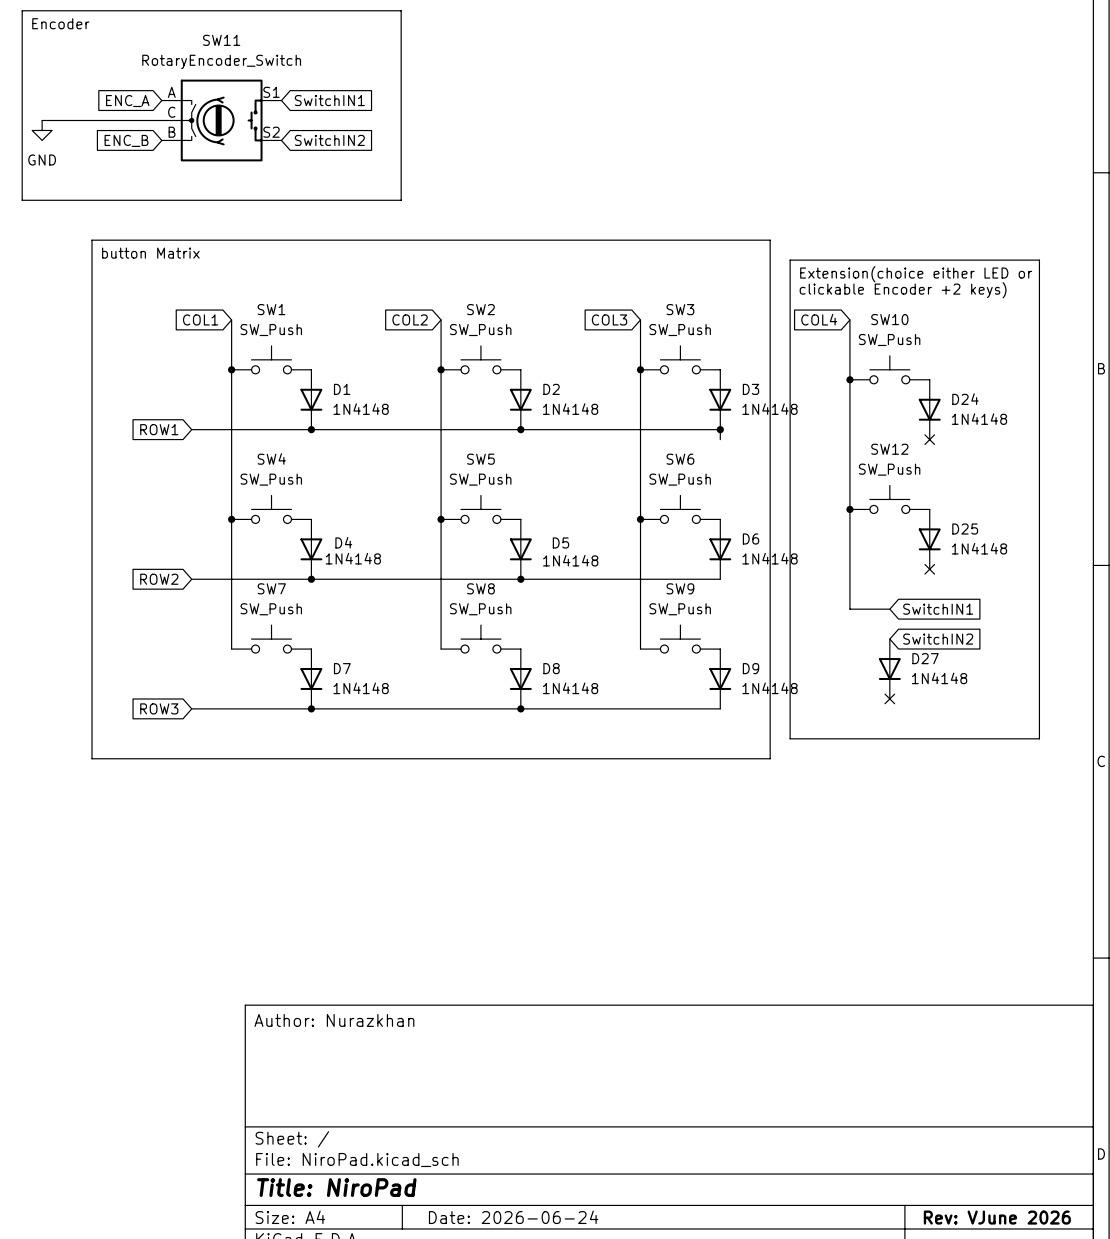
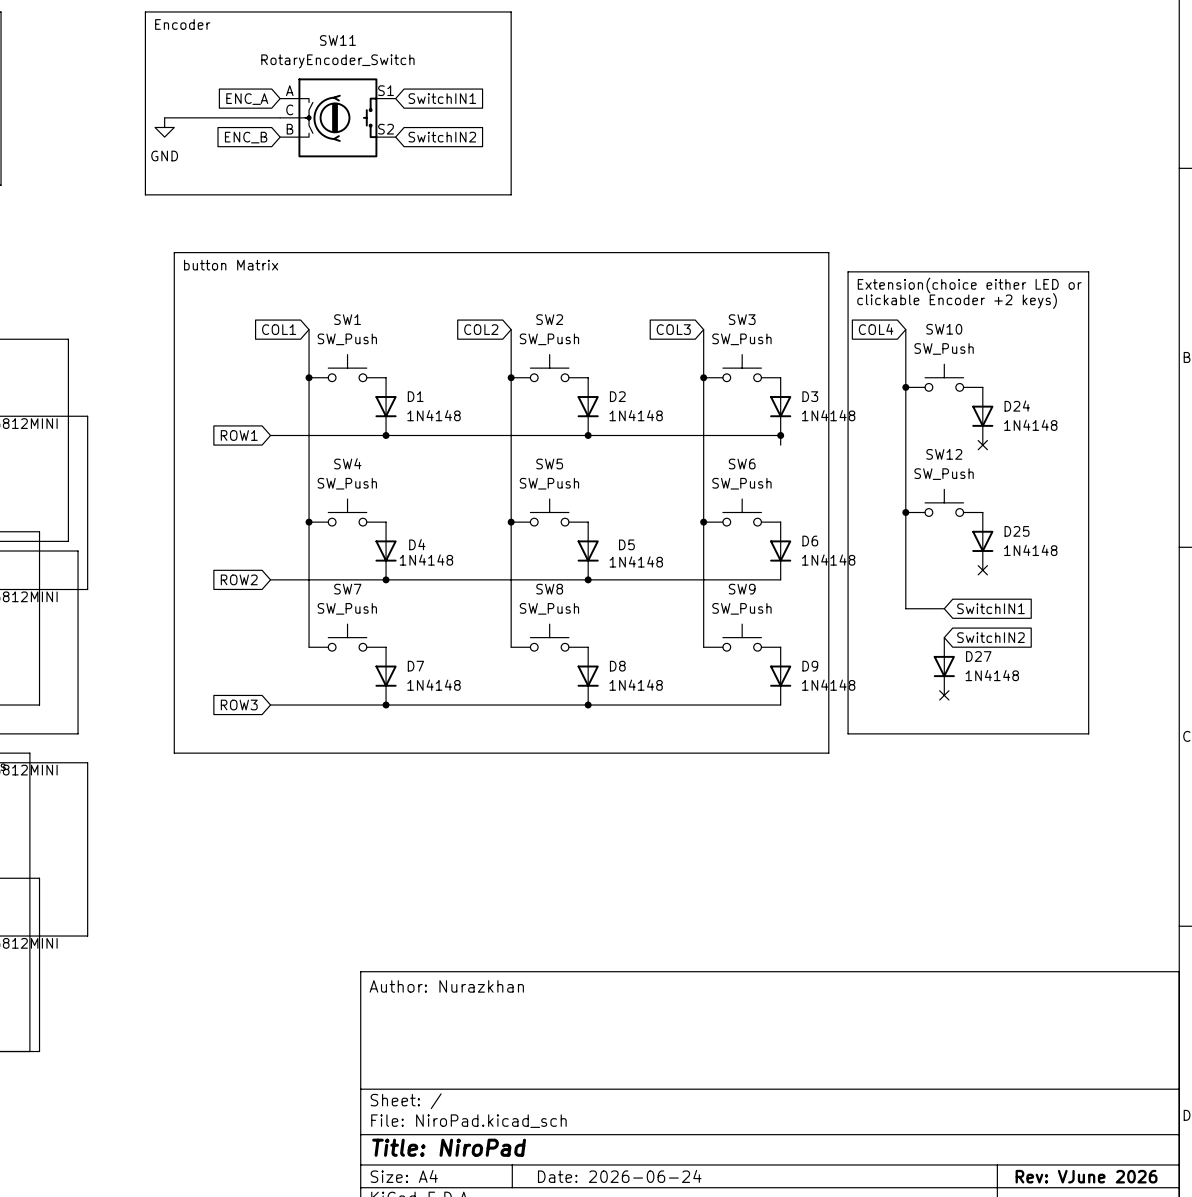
text position: button Matrix (150, 253) -> button Matrix (231, 265)
line: none -> (174, 252) (828, 252) (828, 753) (174, 753) (174, 252)
line: (790, 260) (1039, 260) (1039, 738) (790, 738) (790, 260) -> none
text position: Extension(choice either LED or (916, 274) -> Extension(choice either LED or (969, 285)
text position: clickable Encoder +2 keys) (903, 290) -> clickable Encoder +2 keys) (957, 301)
global label position: COL1 (200, 319) -> COL1 (279, 329)
wire: (231, 319) (231, 649) -> (309, 329) (309, 647)
global label position: COL2 (410, 319) -> COL2 (481, 329)
wire: (441, 319) (441, 649) -> (511, 329) (511, 647)
global label position: COL3 (609, 319) -> COL3 (673, 329)
wire: (640, 319) (640, 649) -> (703, 329) (703, 647)
global label position: COL4 (819, 319) -> COL4 (876, 329)
wire: (849, 319) (849, 609) (889, 609) -> (905, 329) (905, 608) (944, 608)
SW1 position: (271, 359) -> (347, 368)
SW2 position: (480, 359) -> (549, 368)
SW3 position: (680, 359) -> (742, 368)
junction: (231, 369) -> none
junction: (441, 369) -> none
junction: (640, 369) -> none
SW10 position: (889, 369) -> (944, 377)
junction position: (849, 379) -> (905, 387)
junction: none -> (309, 377)
junction: none -> (511, 377)
junction: none -> (703, 377)
D1 position: (311, 399) -> (386, 406)
D2 position: (520, 399) -> (588, 406)
D3 position: (720, 399) -> (780, 406)
D24 position: (929, 409) -> (982, 416)
global label position: ROW1 (159, 429) -> ROW1 (239, 435)
wire: (191, 429) (720, 429) (720, 439) -> (270, 435) (780, 435) (780, 445)
junction: (311, 429) -> none
junction: (520, 429) -> none
junction: (720, 429) -> none
no-connect mark position: (929, 439) -> (982, 445)
junction: none -> (386, 435)
junction: none -> (588, 435)
junction: none -> (780, 435)
SW12 position: (889, 499) -> (944, 502)
SW4 position: (271, 509) -> (347, 512)
SW5 position: (480, 509) -> (549, 512)
SW6 position: (680, 509) -> (742, 512)
junction position: (849, 509) -> (905, 512)
junction: (231, 519) -> none
junction: (441, 519) -> none
junction: (640, 519) -> none
junction: none -> (309, 522)
junction: none -> (511, 522)
junction: none -> (703, 522)
D25 position: (929, 539) -> (982, 541)
D4 position: (311, 549) -> (386, 551)
D5 position: (520, 549) -> (588, 551)
D6 position: (720, 549) -> (780, 551)
no-connect mark position: (929, 569) -> (982, 570)
global label position: ROW2 (159, 579) -> ROW2 (239, 579)
wire: (191, 579) (720, 579) -> (270, 579) (780, 579)
junction: (311, 579) -> none
junction: (520, 579) -> none
junction: none -> (386, 579)
junction: none -> (588, 579)
global label position: SwitchIN1 (938, 609) -> SwitchIN1 (990, 608)
SW7 position: (271, 639) -> (347, 637)
SW8 position: (480, 639) -> (549, 637)
SW9 position: (680, 639) -> (742, 637)
global label position: SwitchIN2 (938, 639) -> SwitchIN2 (990, 637)
D27 position: (889, 669) -> (944, 666)
D7 position: (311, 678) -> (386, 676)
D8 position: (520, 678) -> (588, 676)
D9 position: (720, 678) -> (780, 676)
no-connect mark position: (889, 698) -> (944, 695)
global label position: ROW3 (159, 708) -> ROW3 (239, 705)
wire: (191, 708) (720, 708) -> (270, 705) (780, 705)
junction position: (311, 708) -> (386, 705)
junction position: (520, 708) -> (588, 705)
line: (750, 758) (92, 758) (92, 240) (770, 240) (770, 758) -> (848, 733) (848, 271) (1088, 271) (1088, 733) (867, 733)

